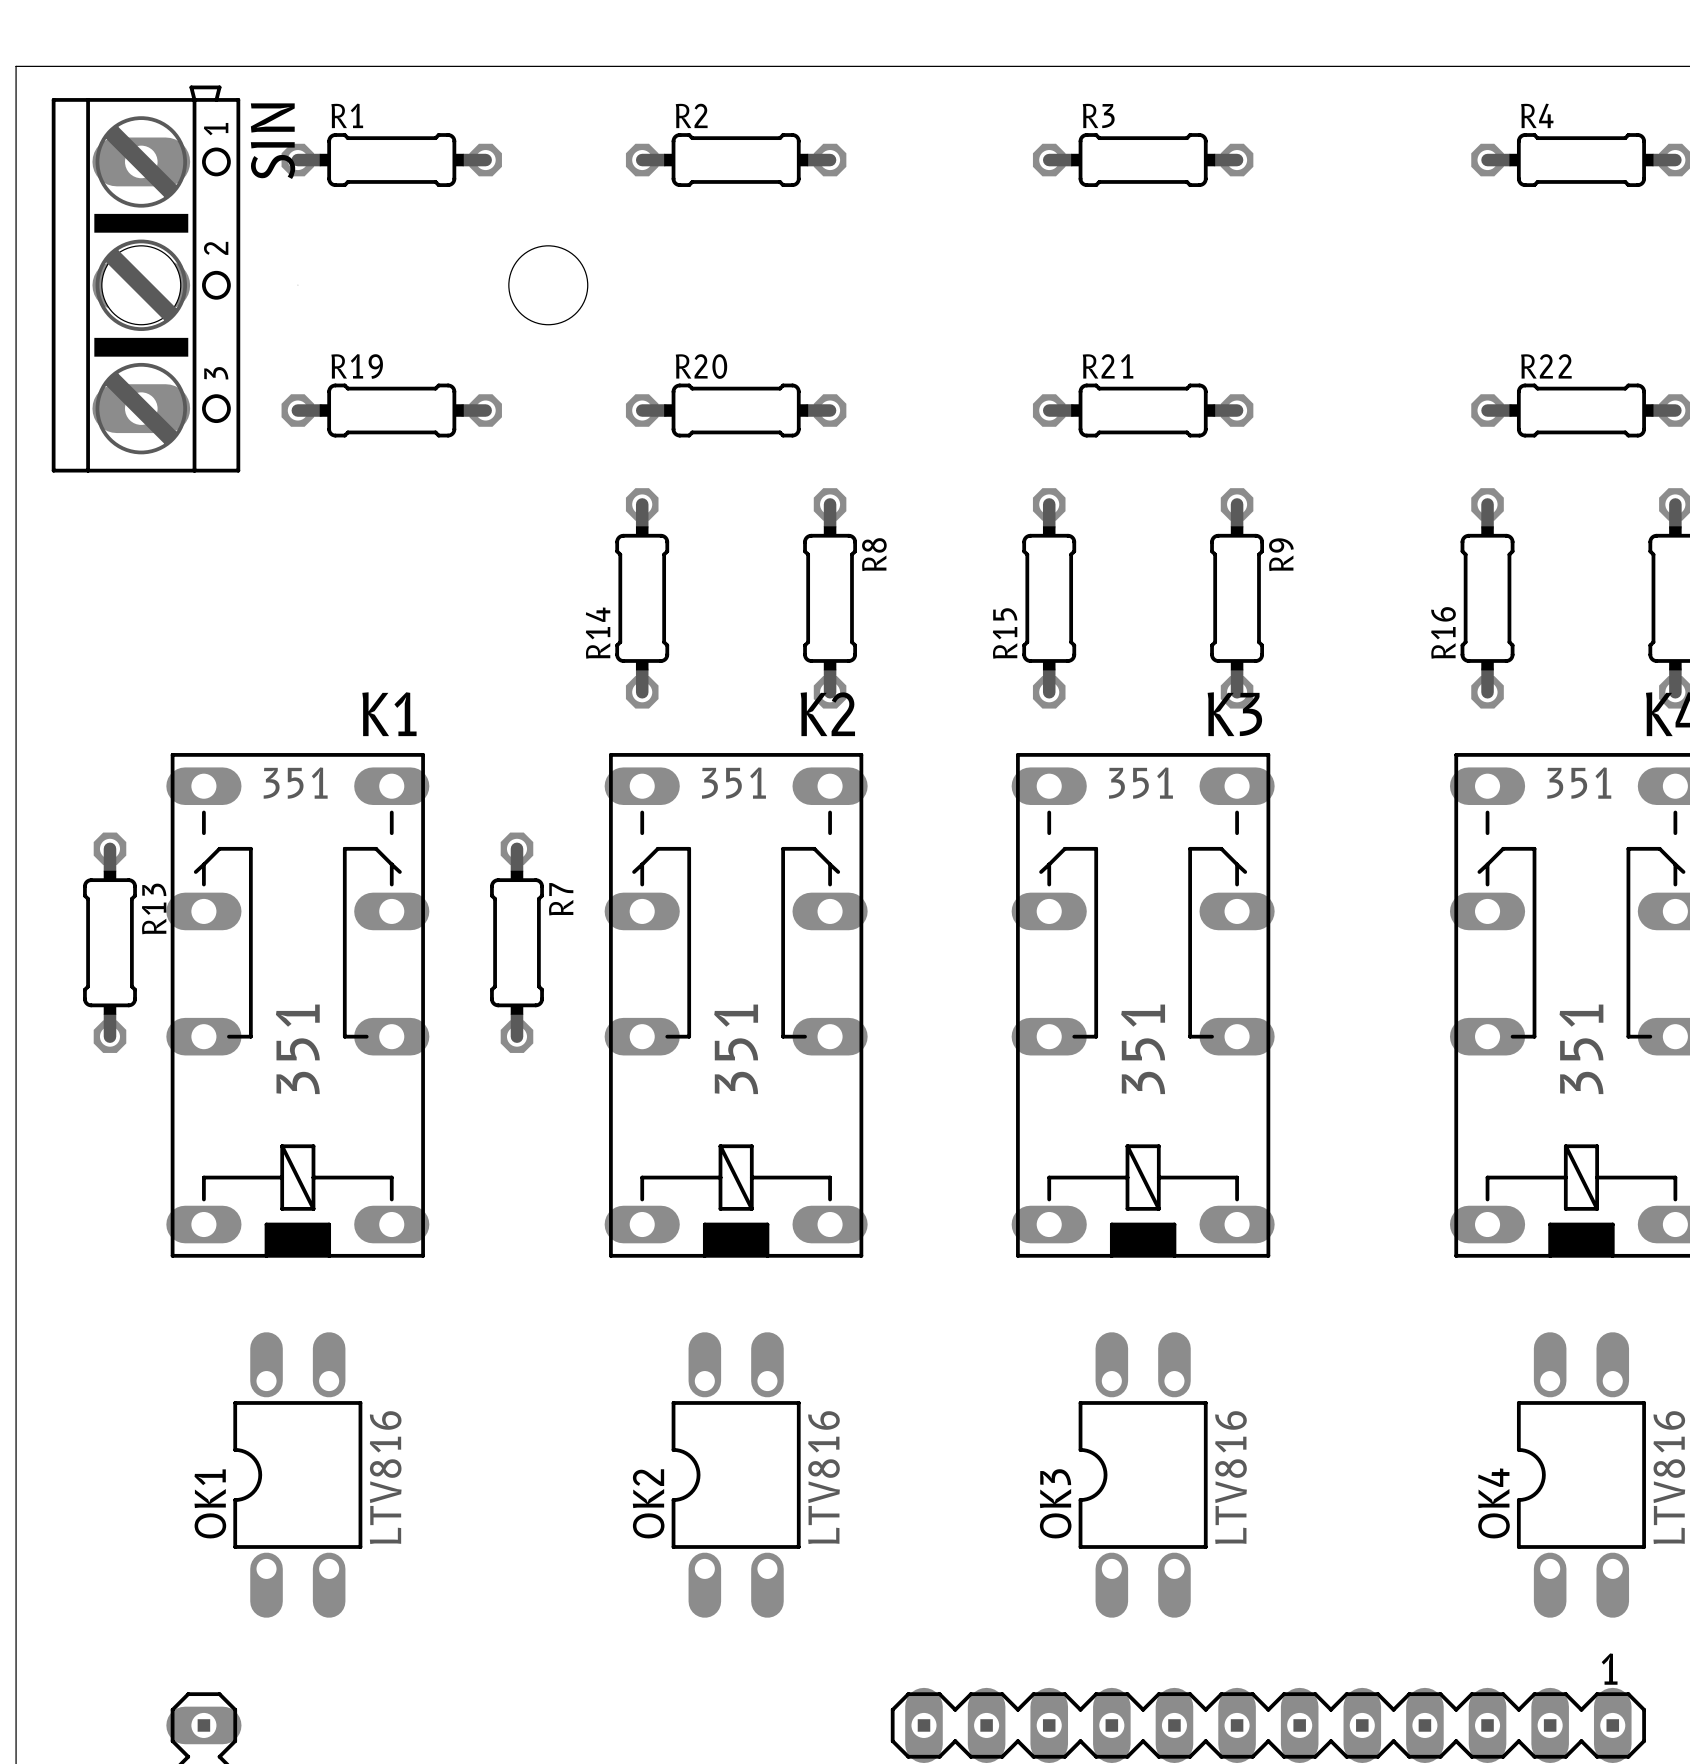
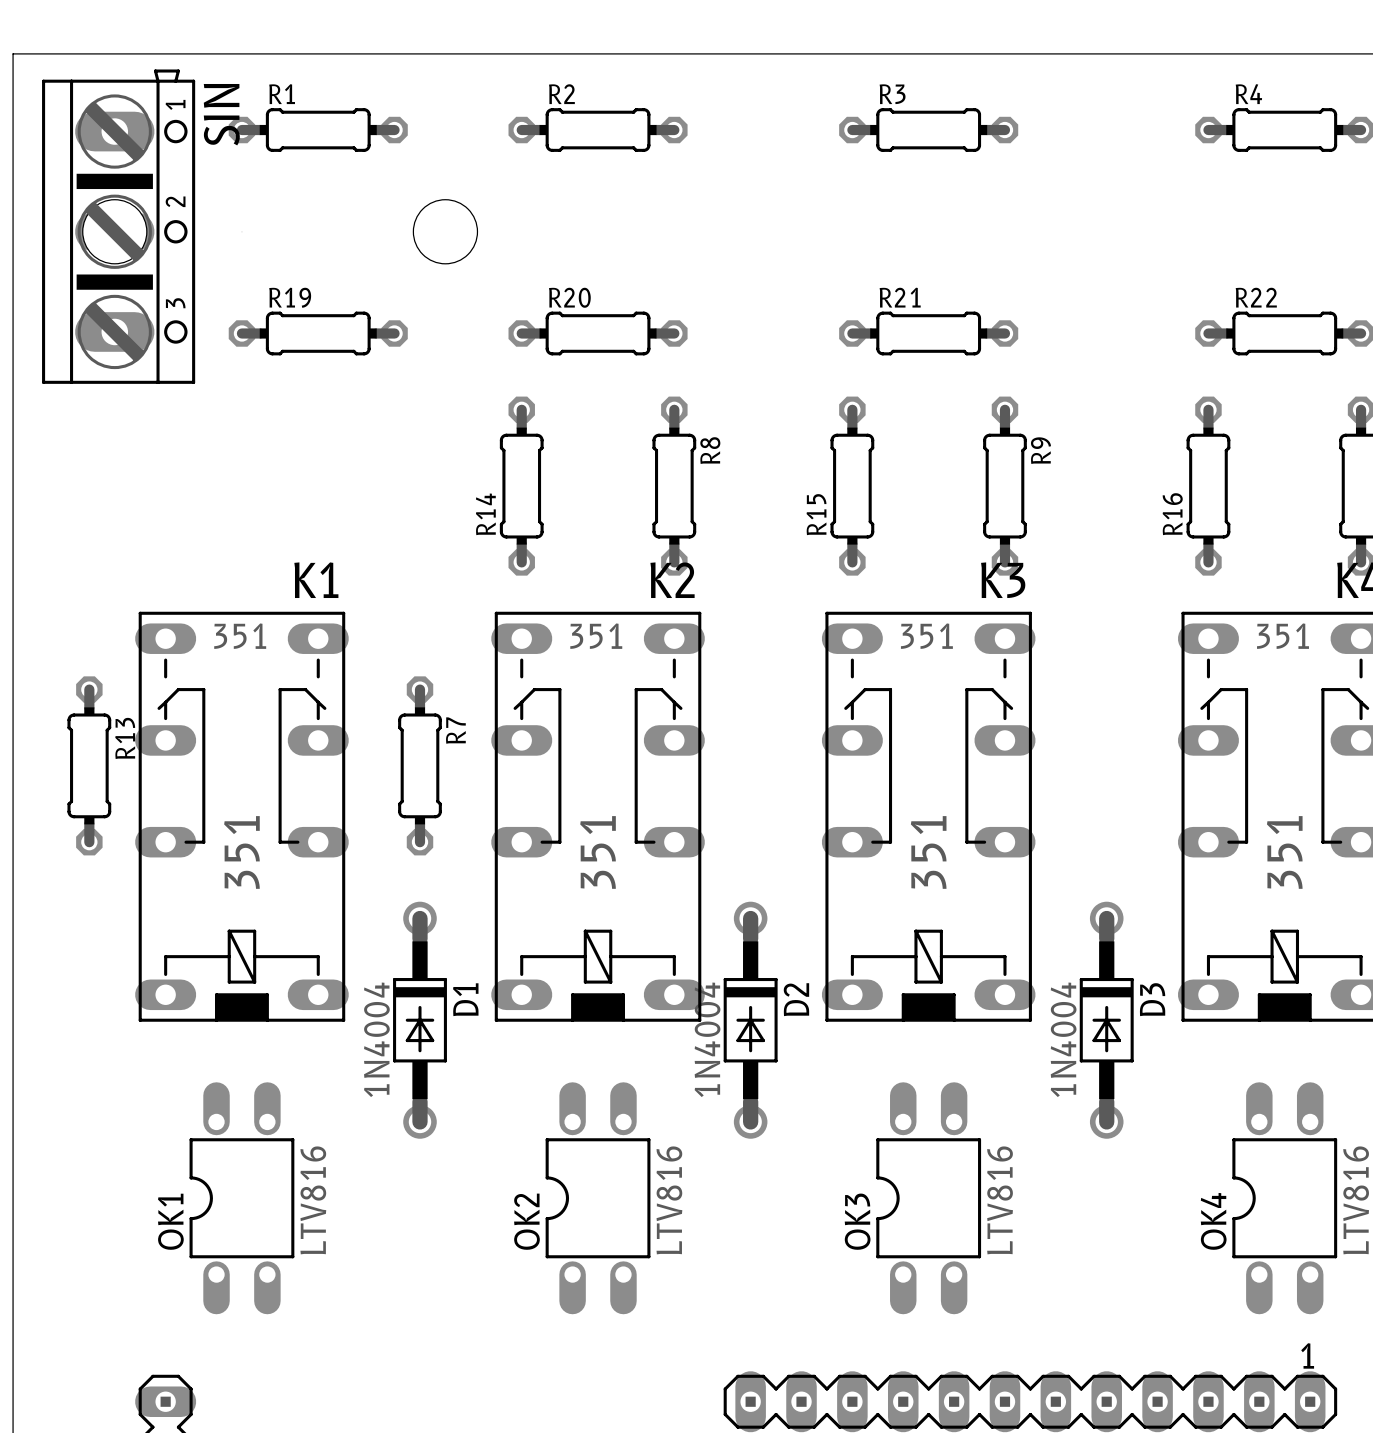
D1: none -> 1N4004 (419, 1020)
D2: none -> 1N4004 (750, 1020)
D3: none -> 1N4004 (1106, 1020)

